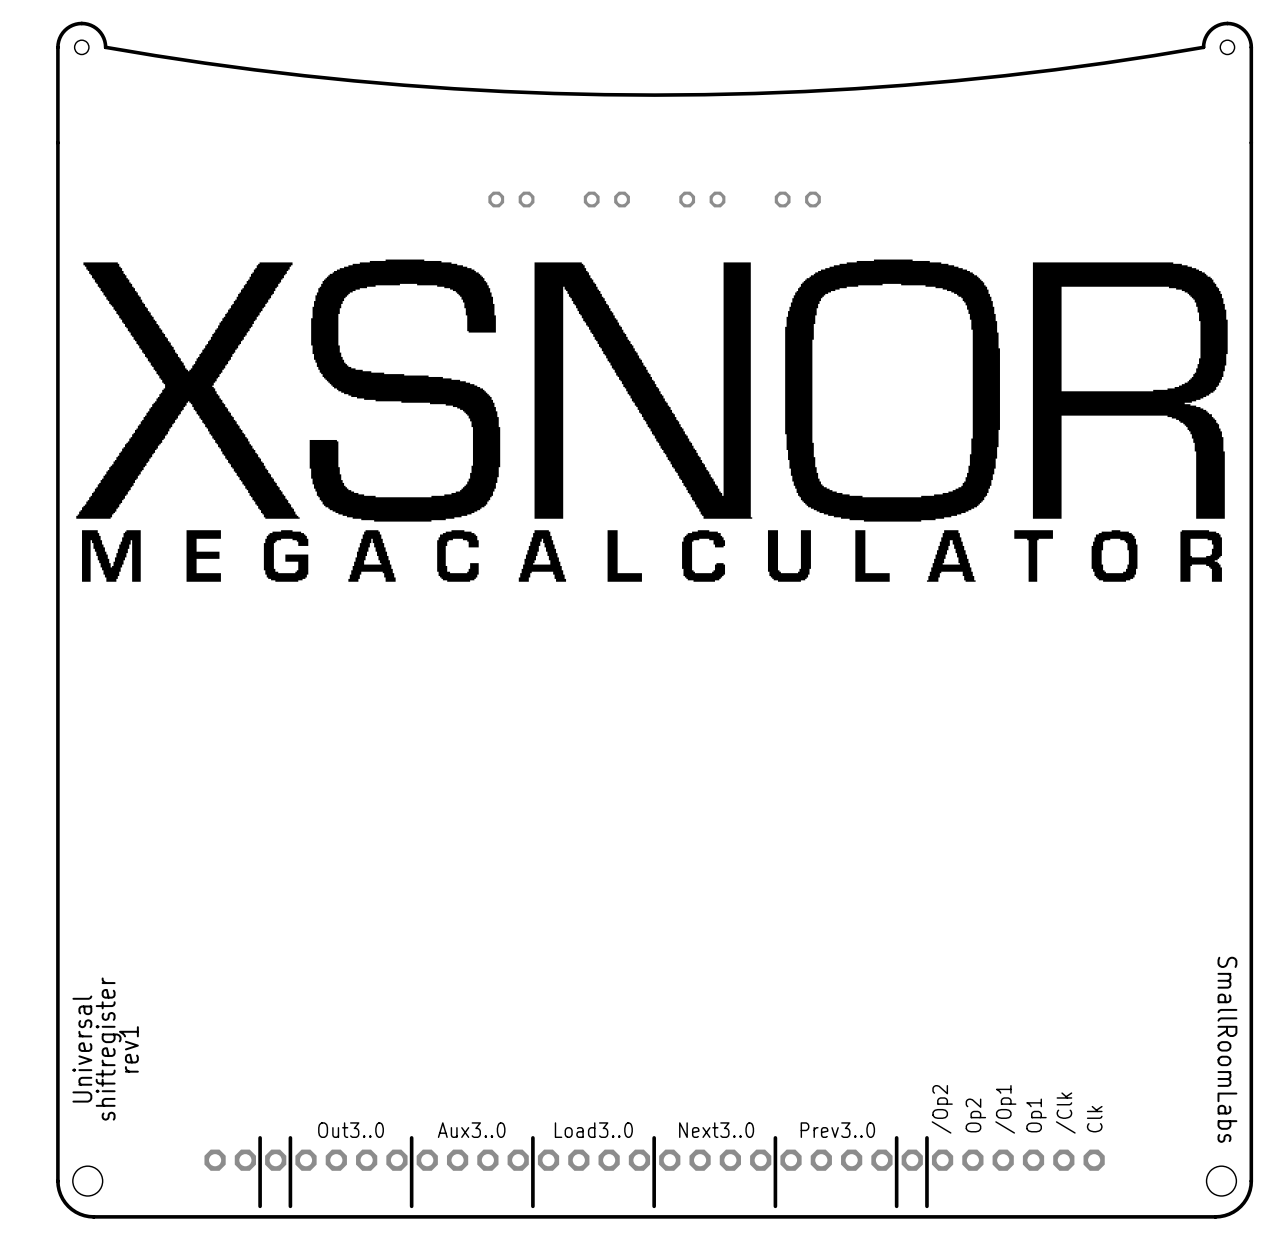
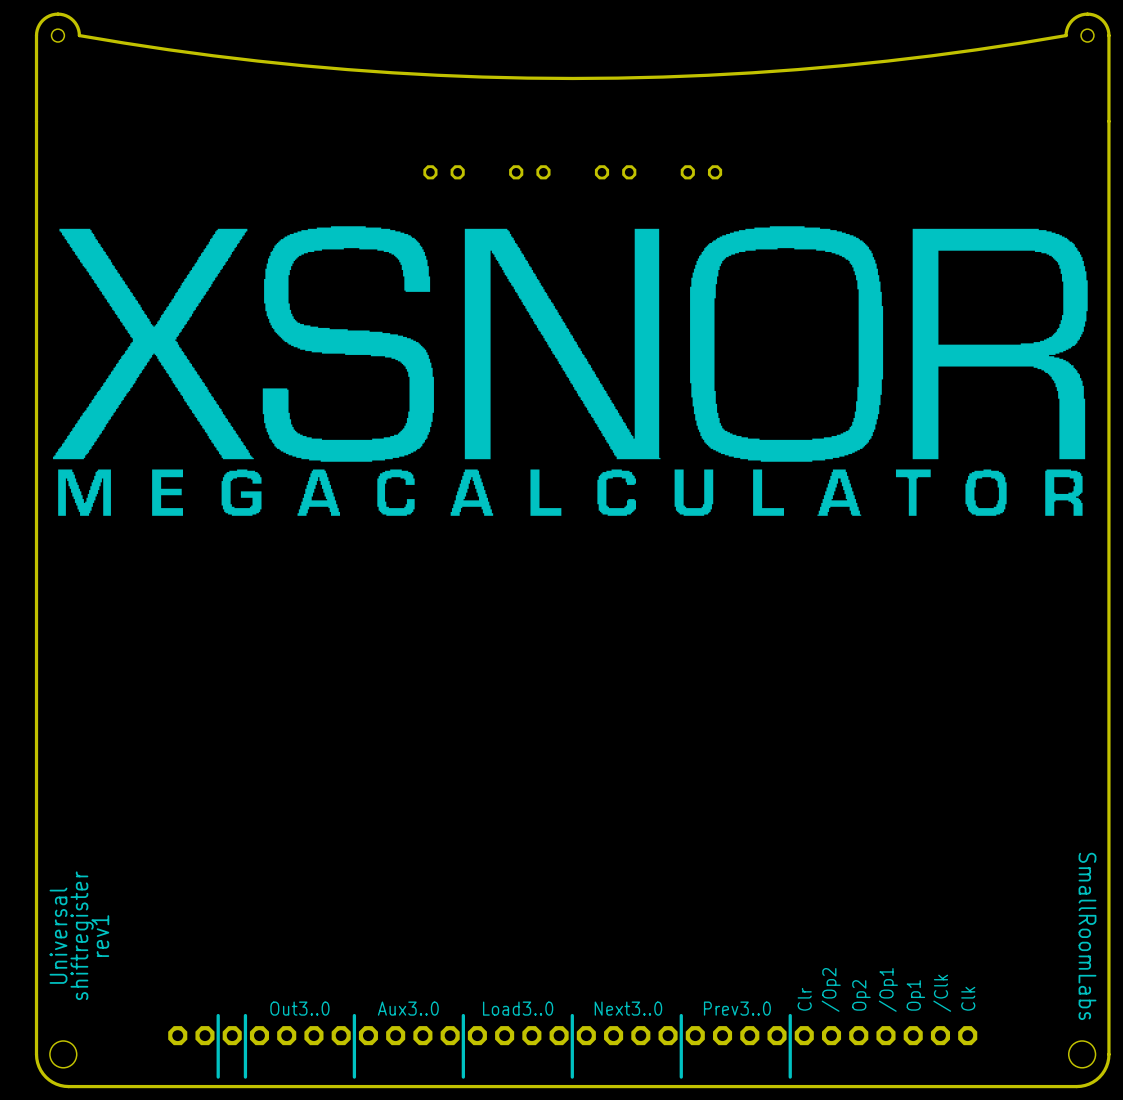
text: none -> Clr (804, 999)
line: (926, 1137) (926, 1206) -> none

